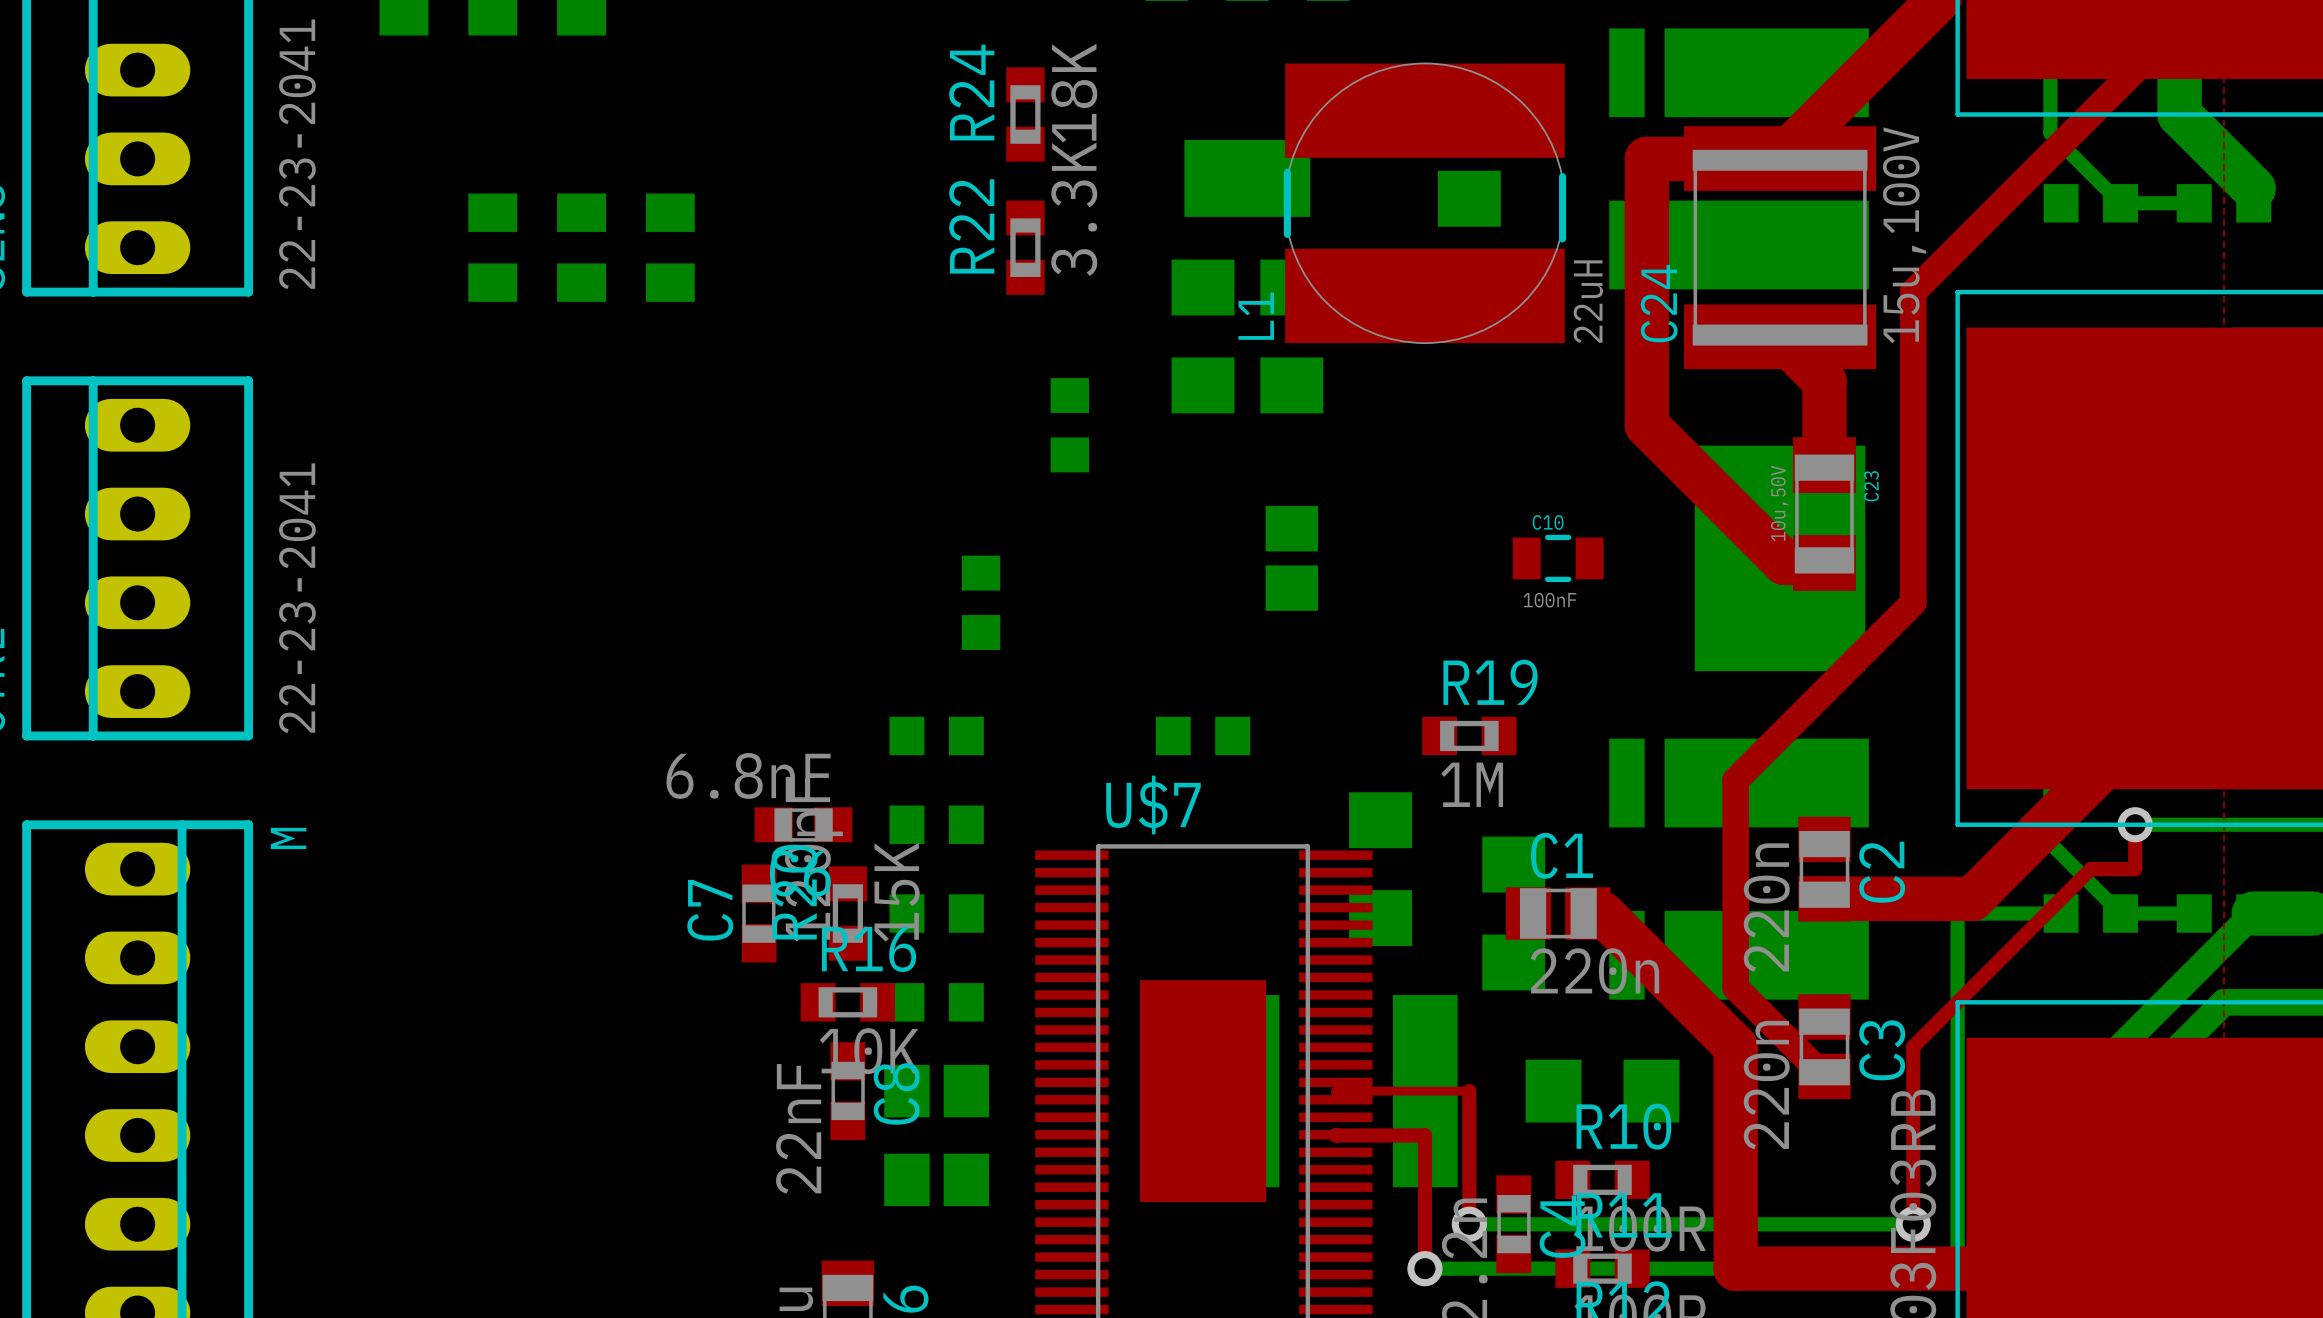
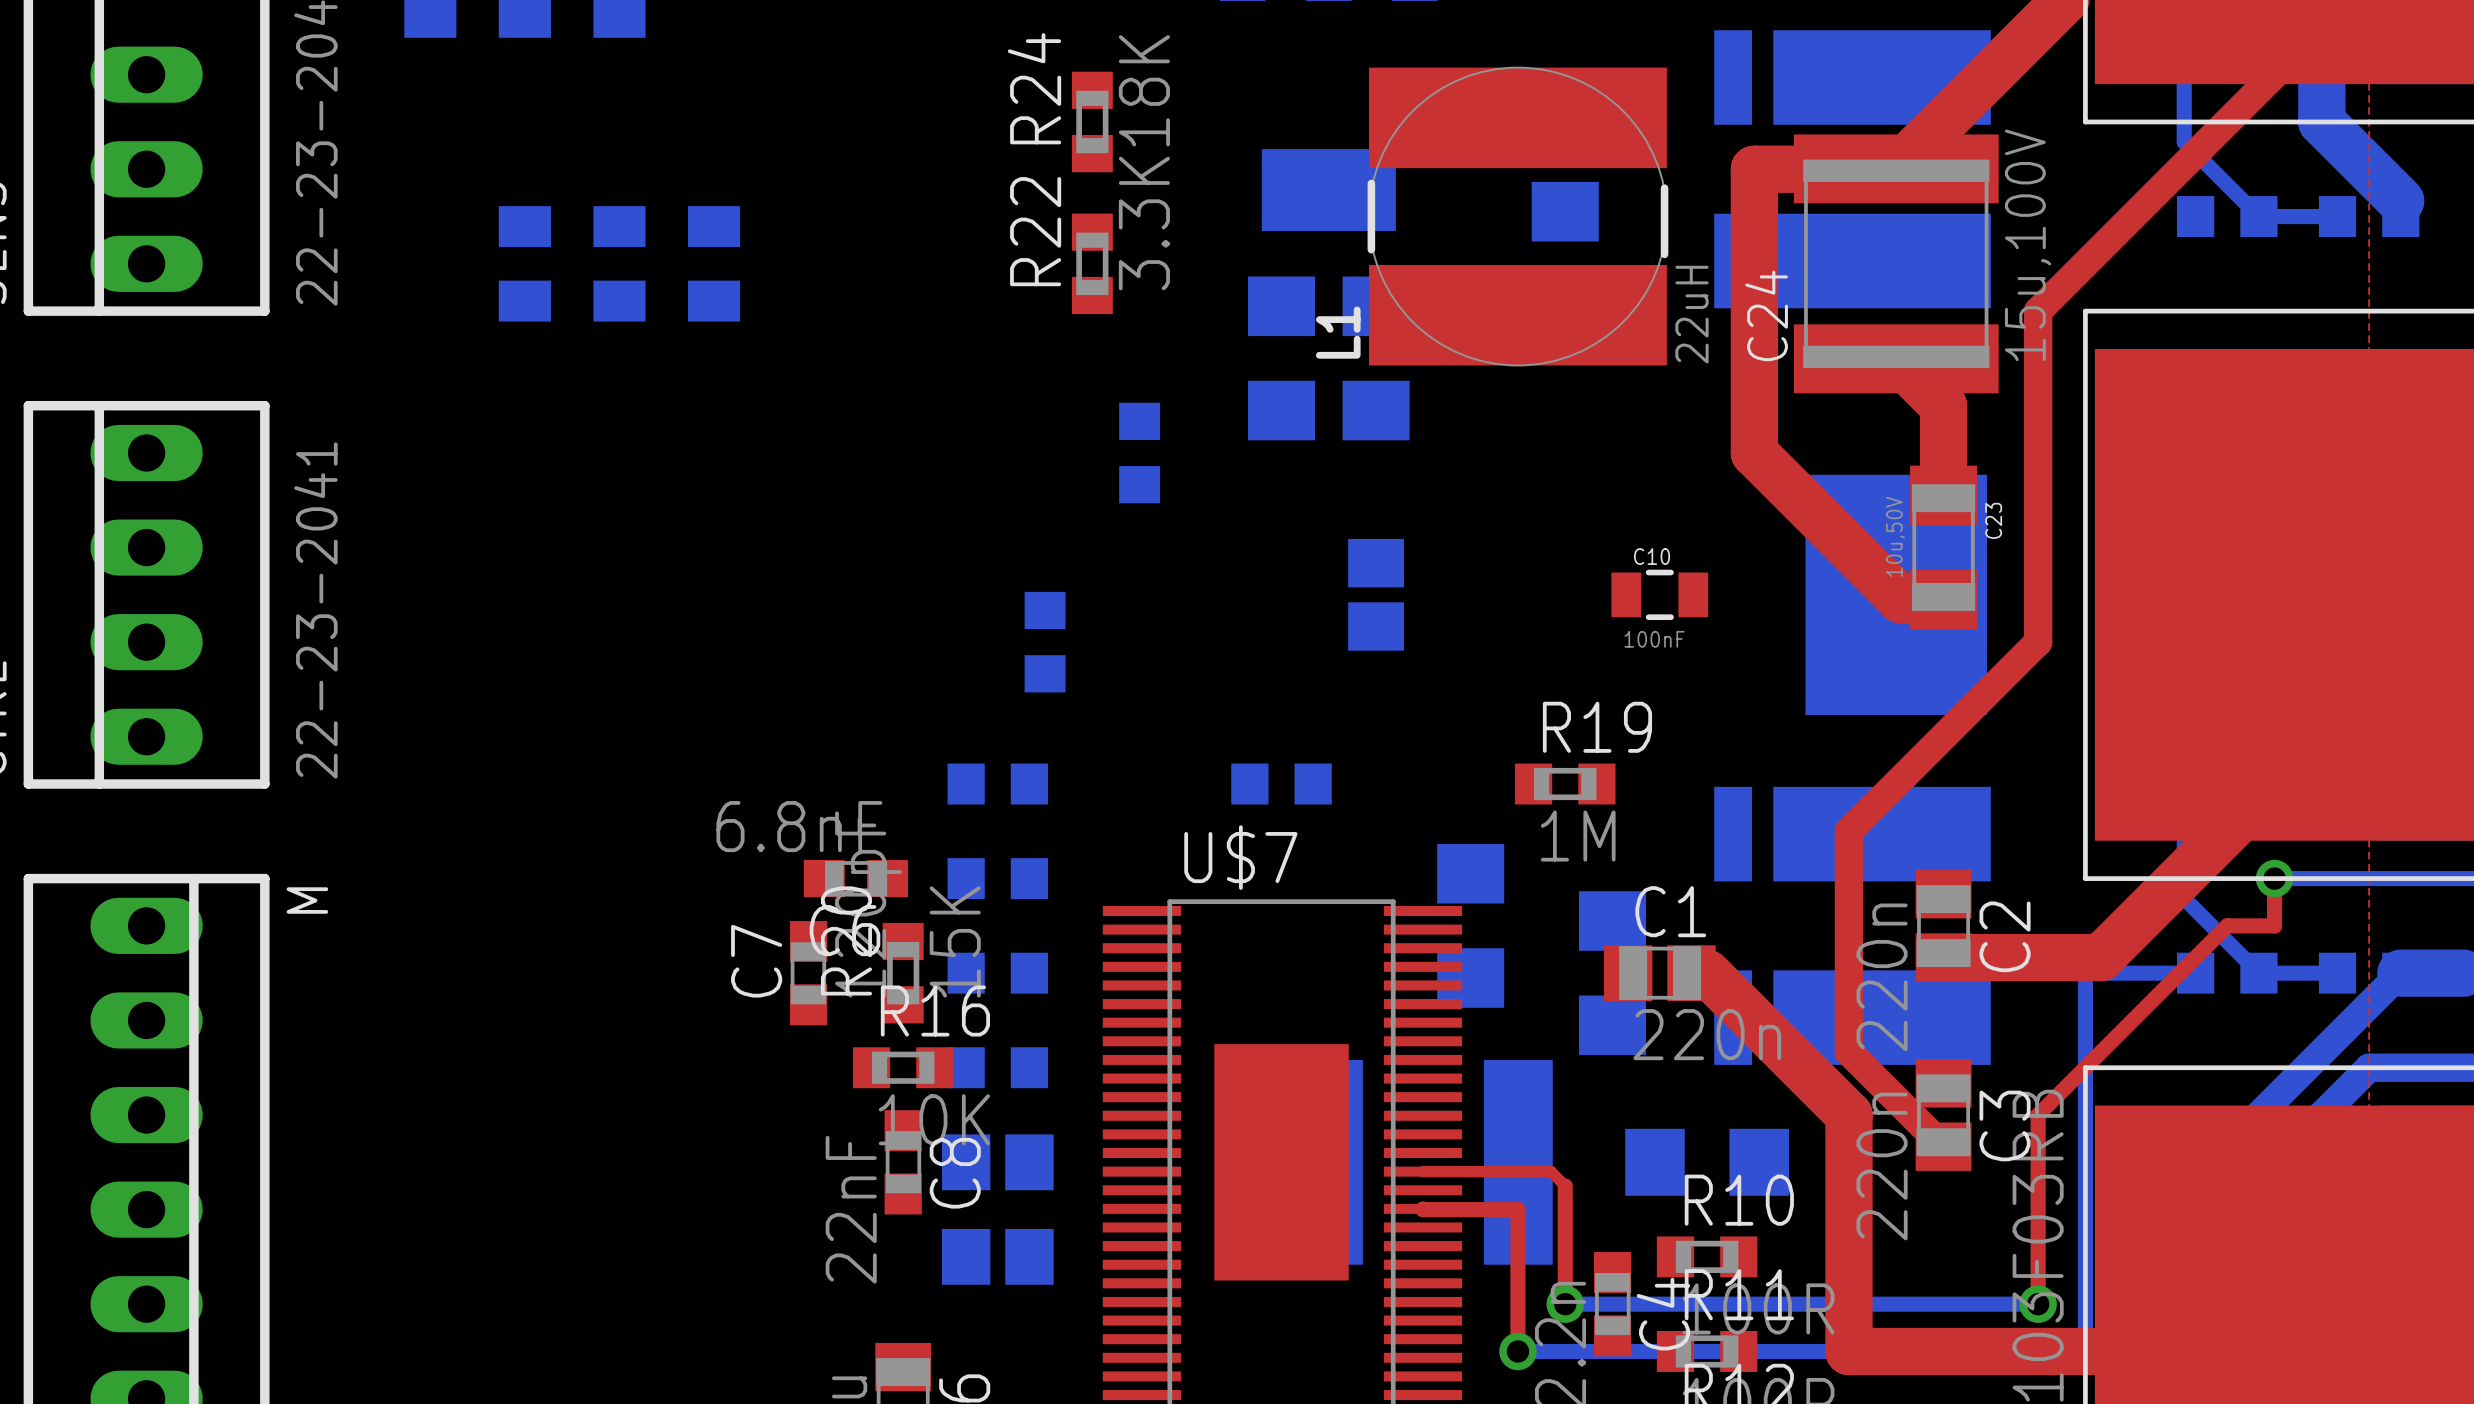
top track: (1335, 1099) (1335, 1091) (1469, 1091) (1469, 1113) -> (1423, 1171) (1550, 1171) (1565, 1185)

